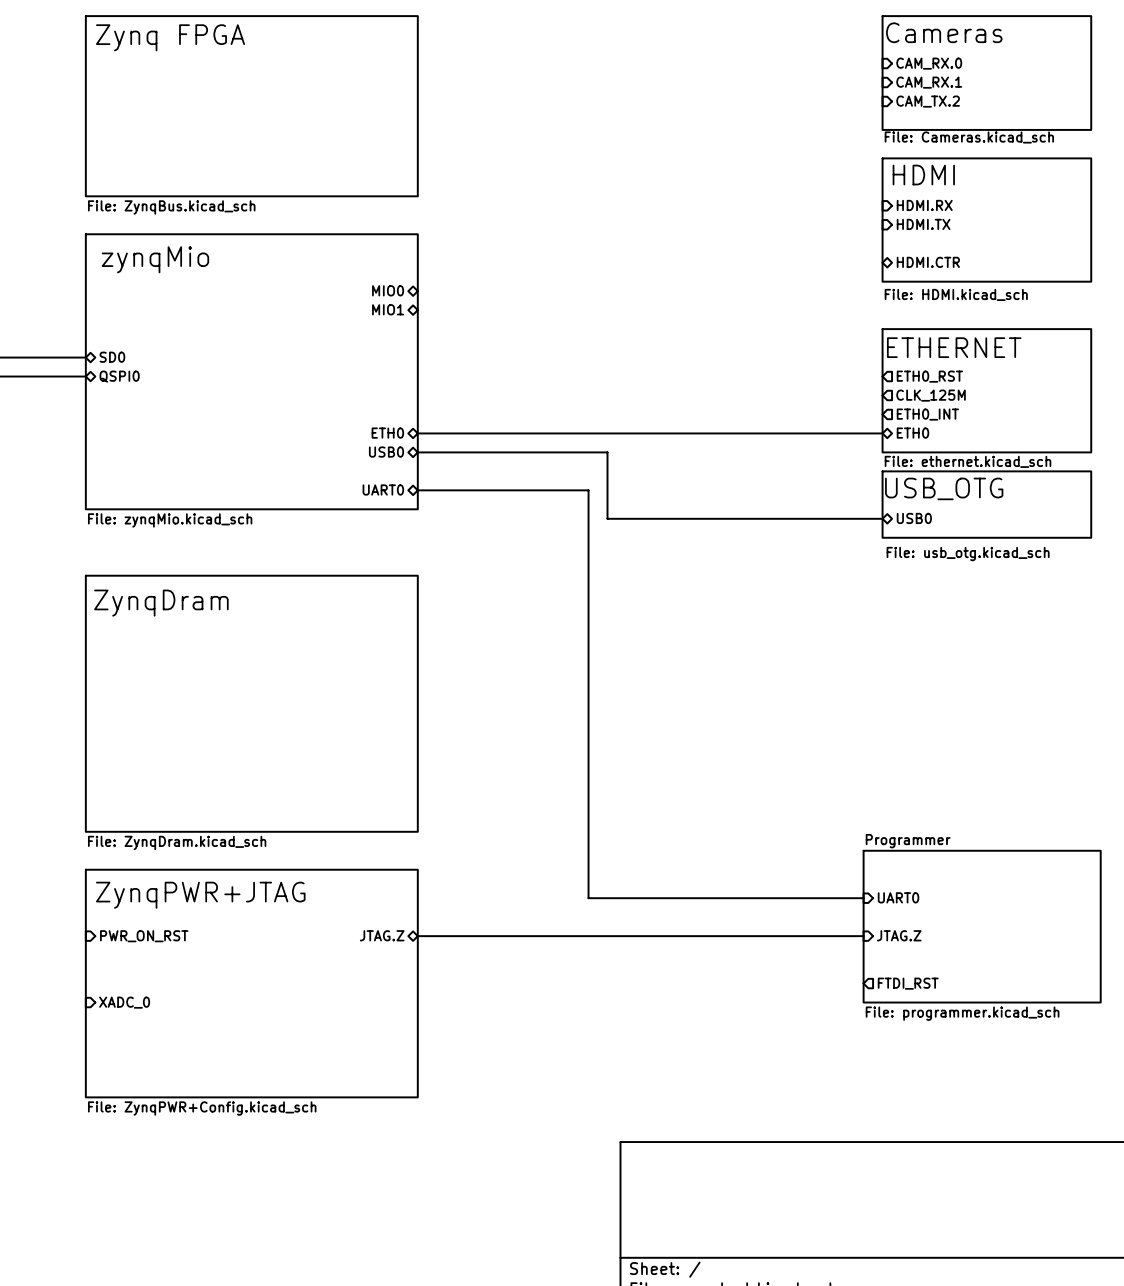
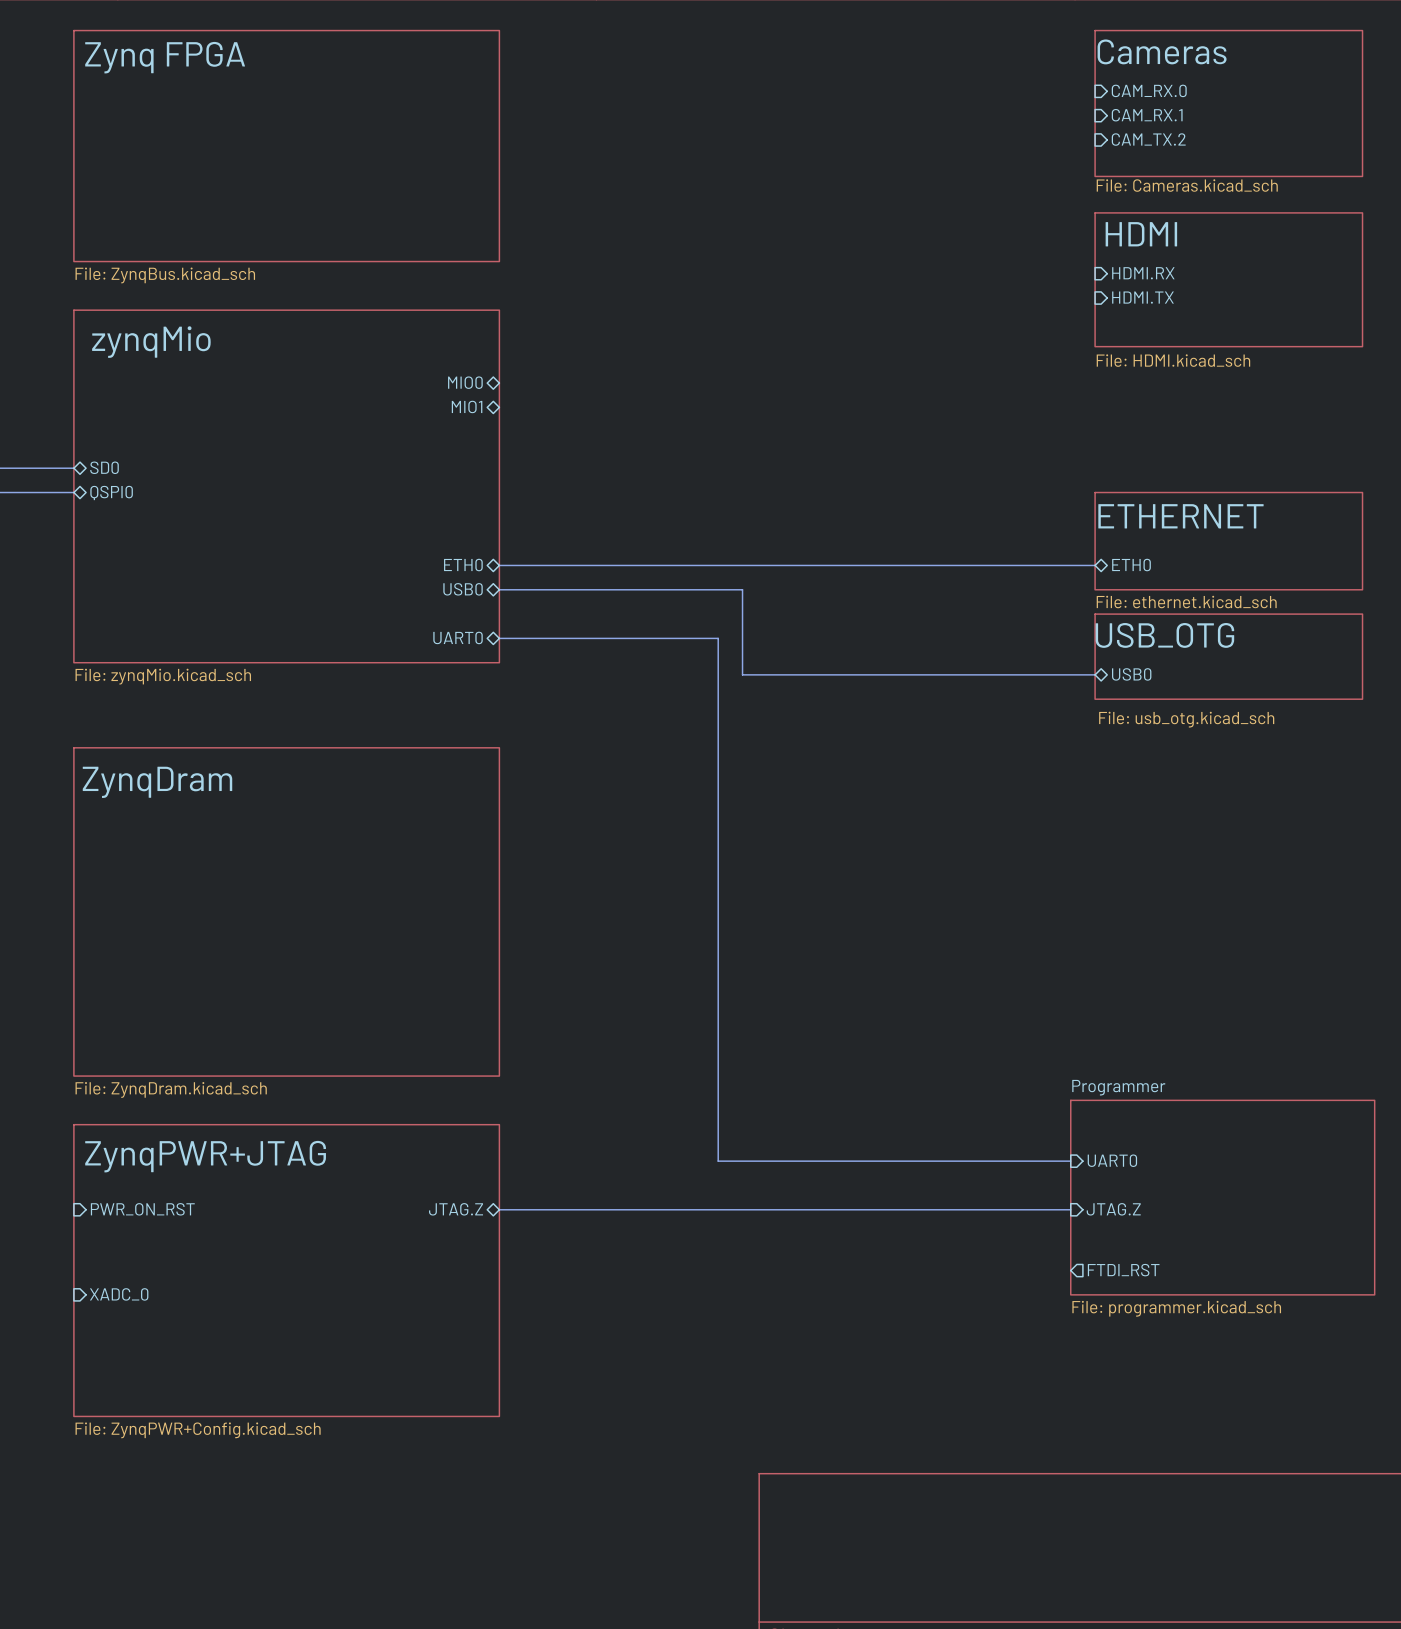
sheet HDMI: none -> File: HDMI.kicad_sch (1228, 279)
sheet HDMI: File: HDMI.kicad_sch (986, 220) -> none
sheet pin: HDMI.CTR (928, 262) -> none
sheet pin: ETH0_RST (929, 376) -> none
sheet ETHERNET: File: ethernet.kicad_sch (986, 390) -> none
sheet pin: CLK_125M (931, 395) -> none
sheet pin: ETH0_INT (927, 414) -> none
sheet ETHERNET: none -> File: ethernet.kicad_sch (1228, 541)

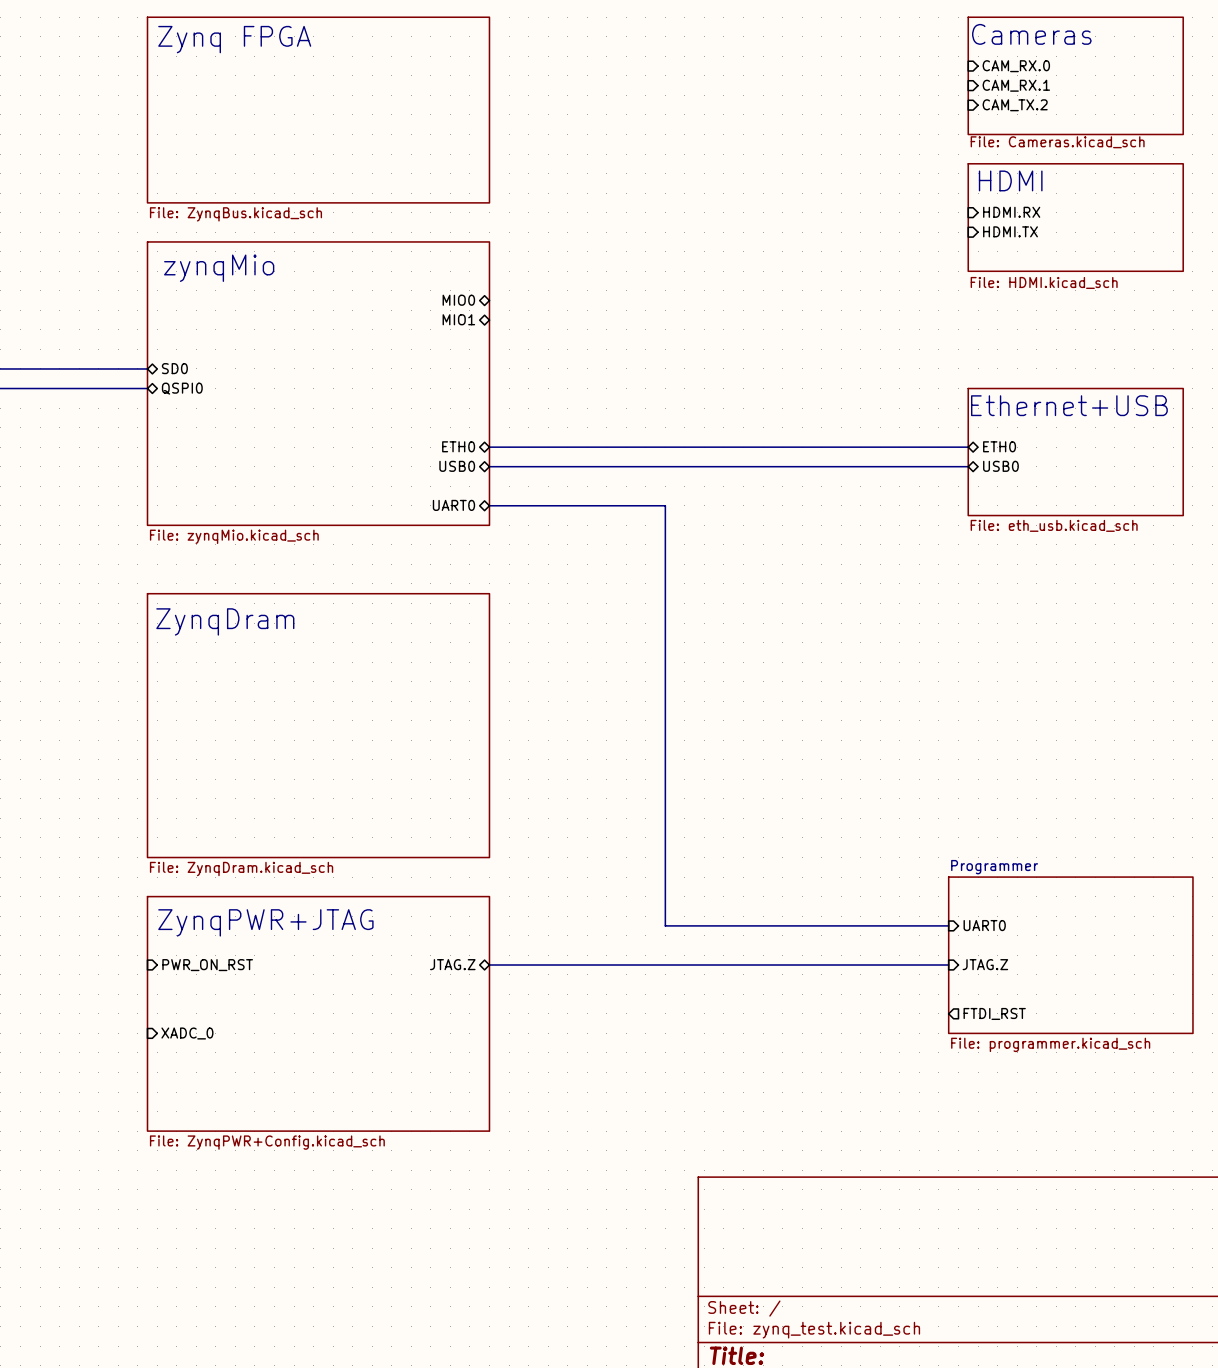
sheet ETHERNET: File: ethernet.kicad_sch (1228, 541) -> none
sheet Ethernet+USB: none -> File: eth_usb.kicad_sch (1075, 452)
bus: (742, 589) (742, 674) (1095, 674) -> (684, 466) (968, 466)
sheet USB_OTG: File: usb_otg.kicad_sch (1228, 656) -> none
sheet pin position: USB0 (1131, 674) -> USB0 (1000, 466)

